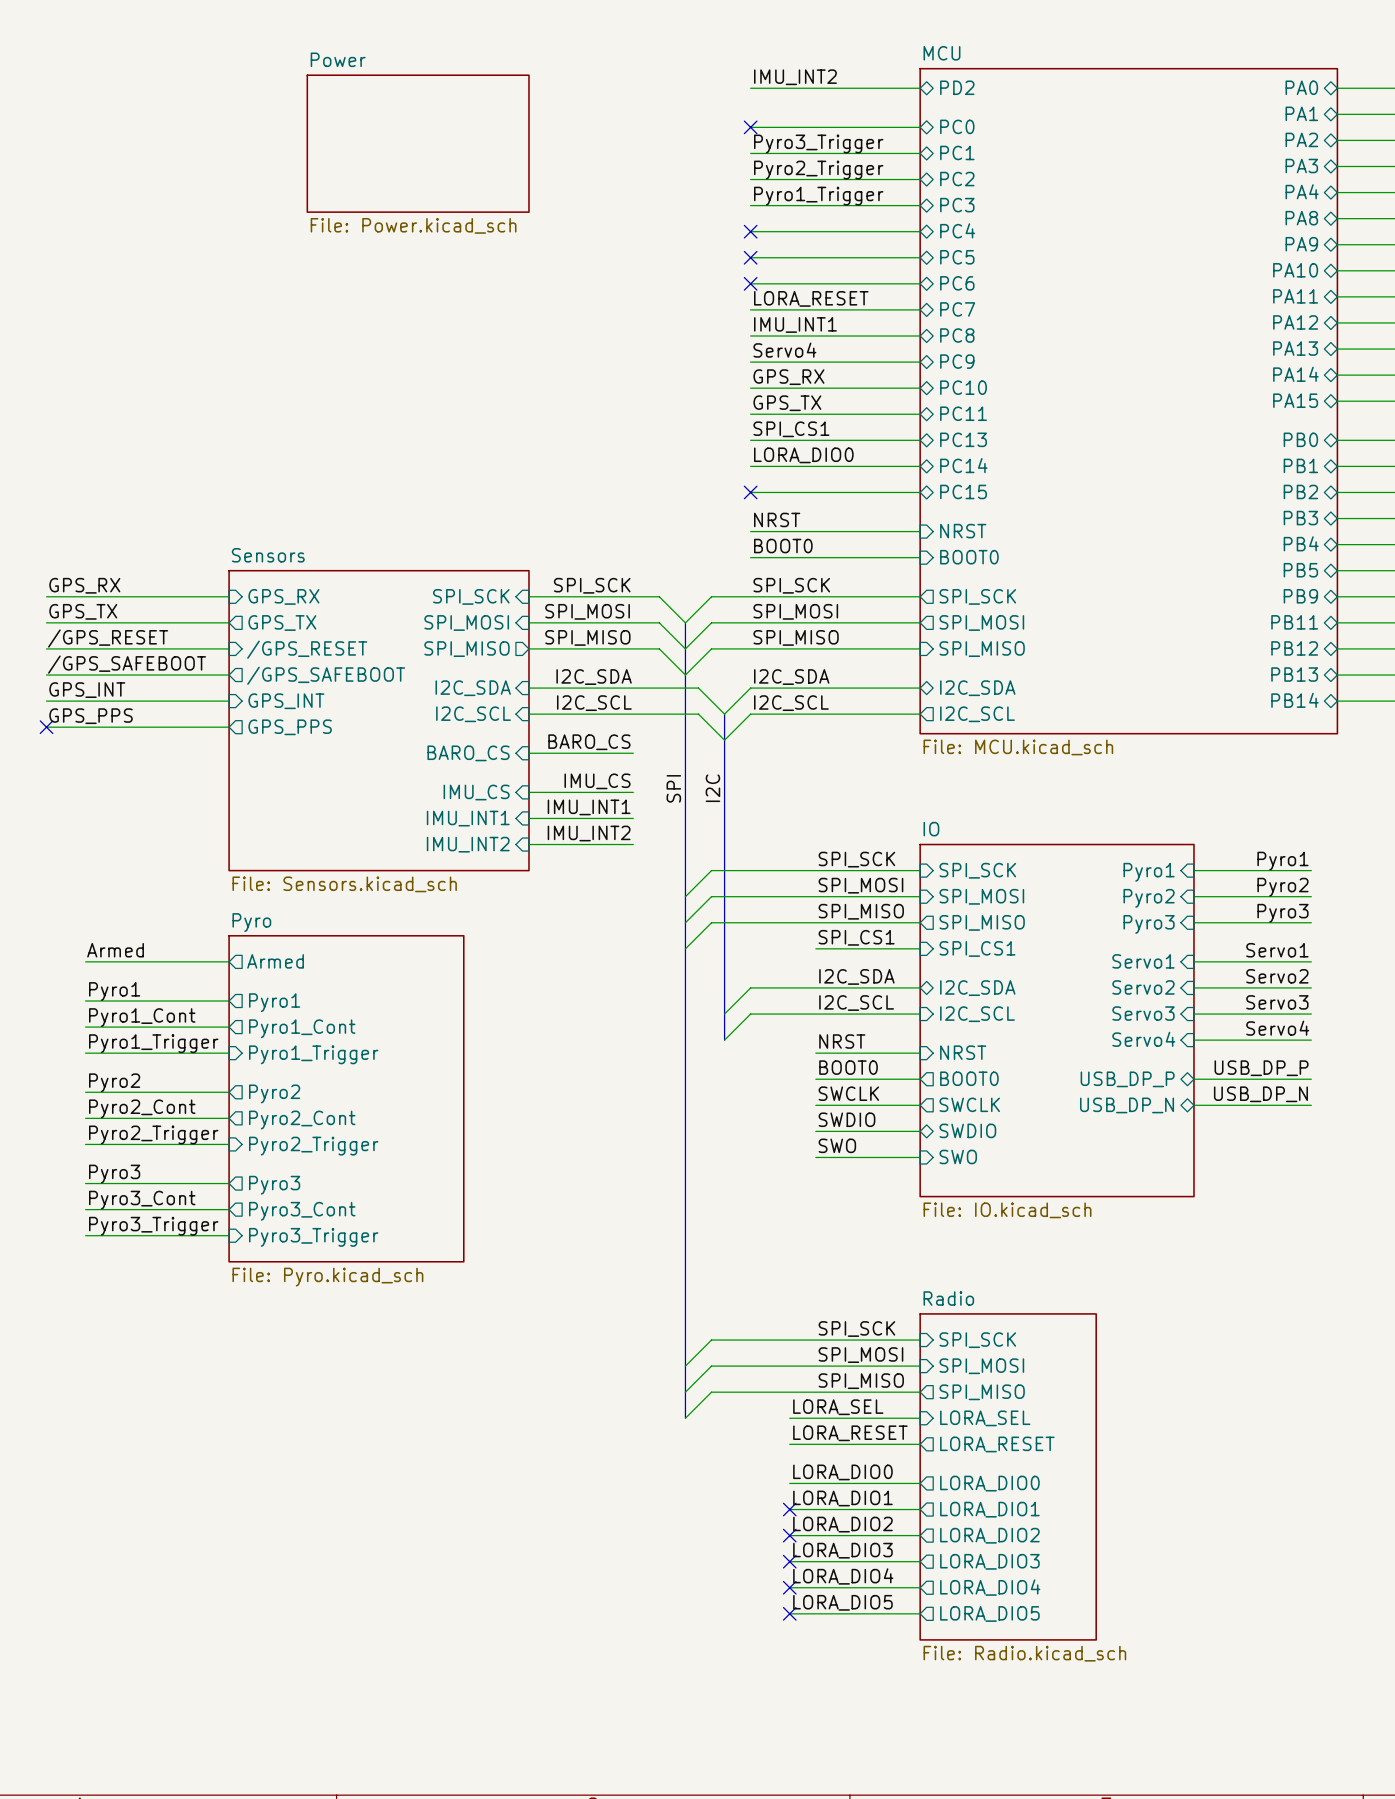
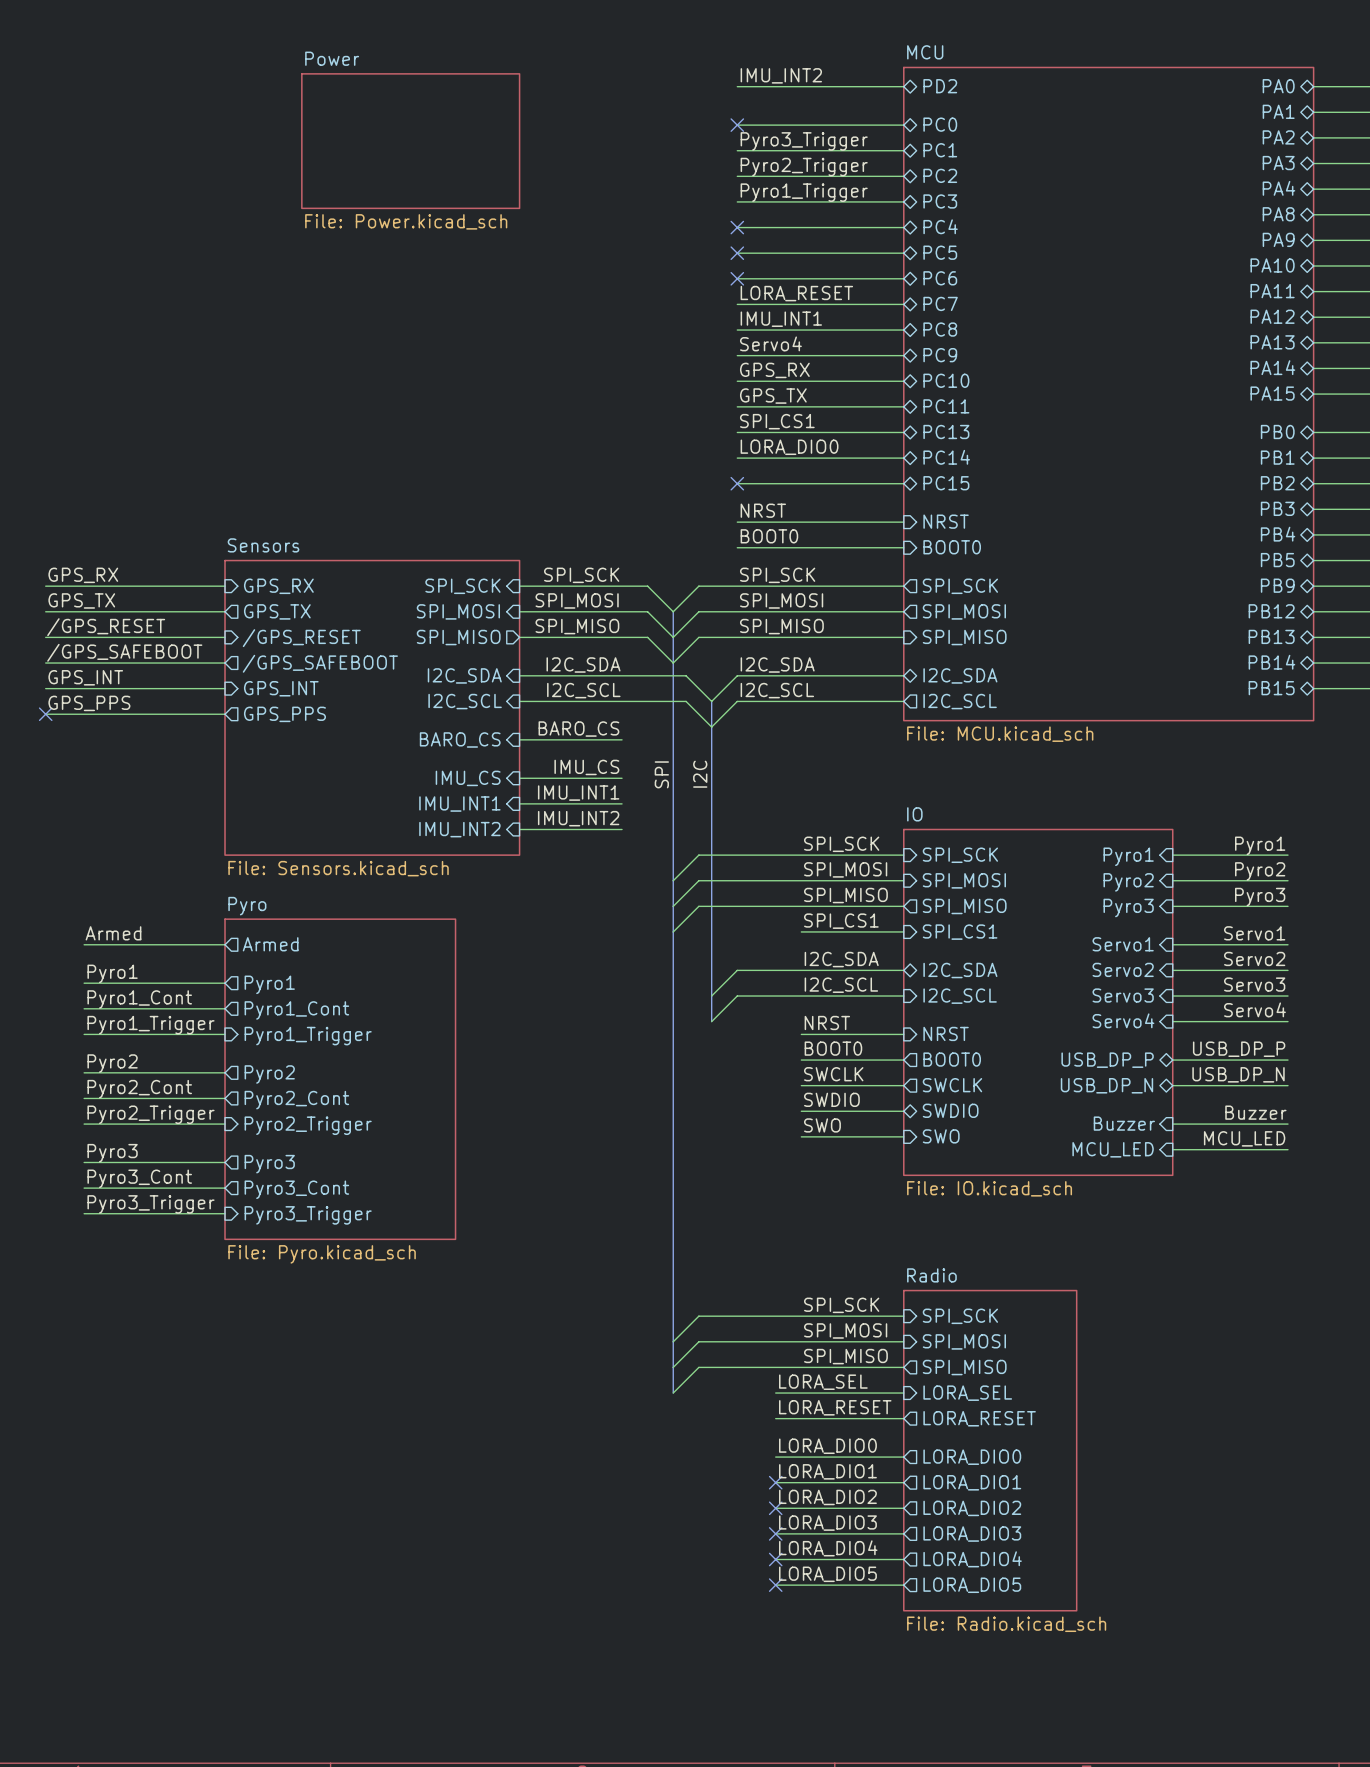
sheet pin: PB11 (1294, 622) -> PB12 (1271, 611)
sheet pin: PB12 (1294, 648) -> PB13 (1271, 636)
sheet pin: PB13 (1294, 674) -> PB14 (1271, 662)
sheet pin: PB14 (1294, 700) -> PB15 (1271, 688)
label: none -> Buzzer (1255, 1112)
sheet pin: none -> Buzzer (1124, 1123)
wire: none -> (1172, 1124) (1288, 1124)
label: none -> MCU_LED (1244, 1138)
sheet pin: none -> MCU_LED (1113, 1149)
wire: none -> (1172, 1149) (1288, 1149)

